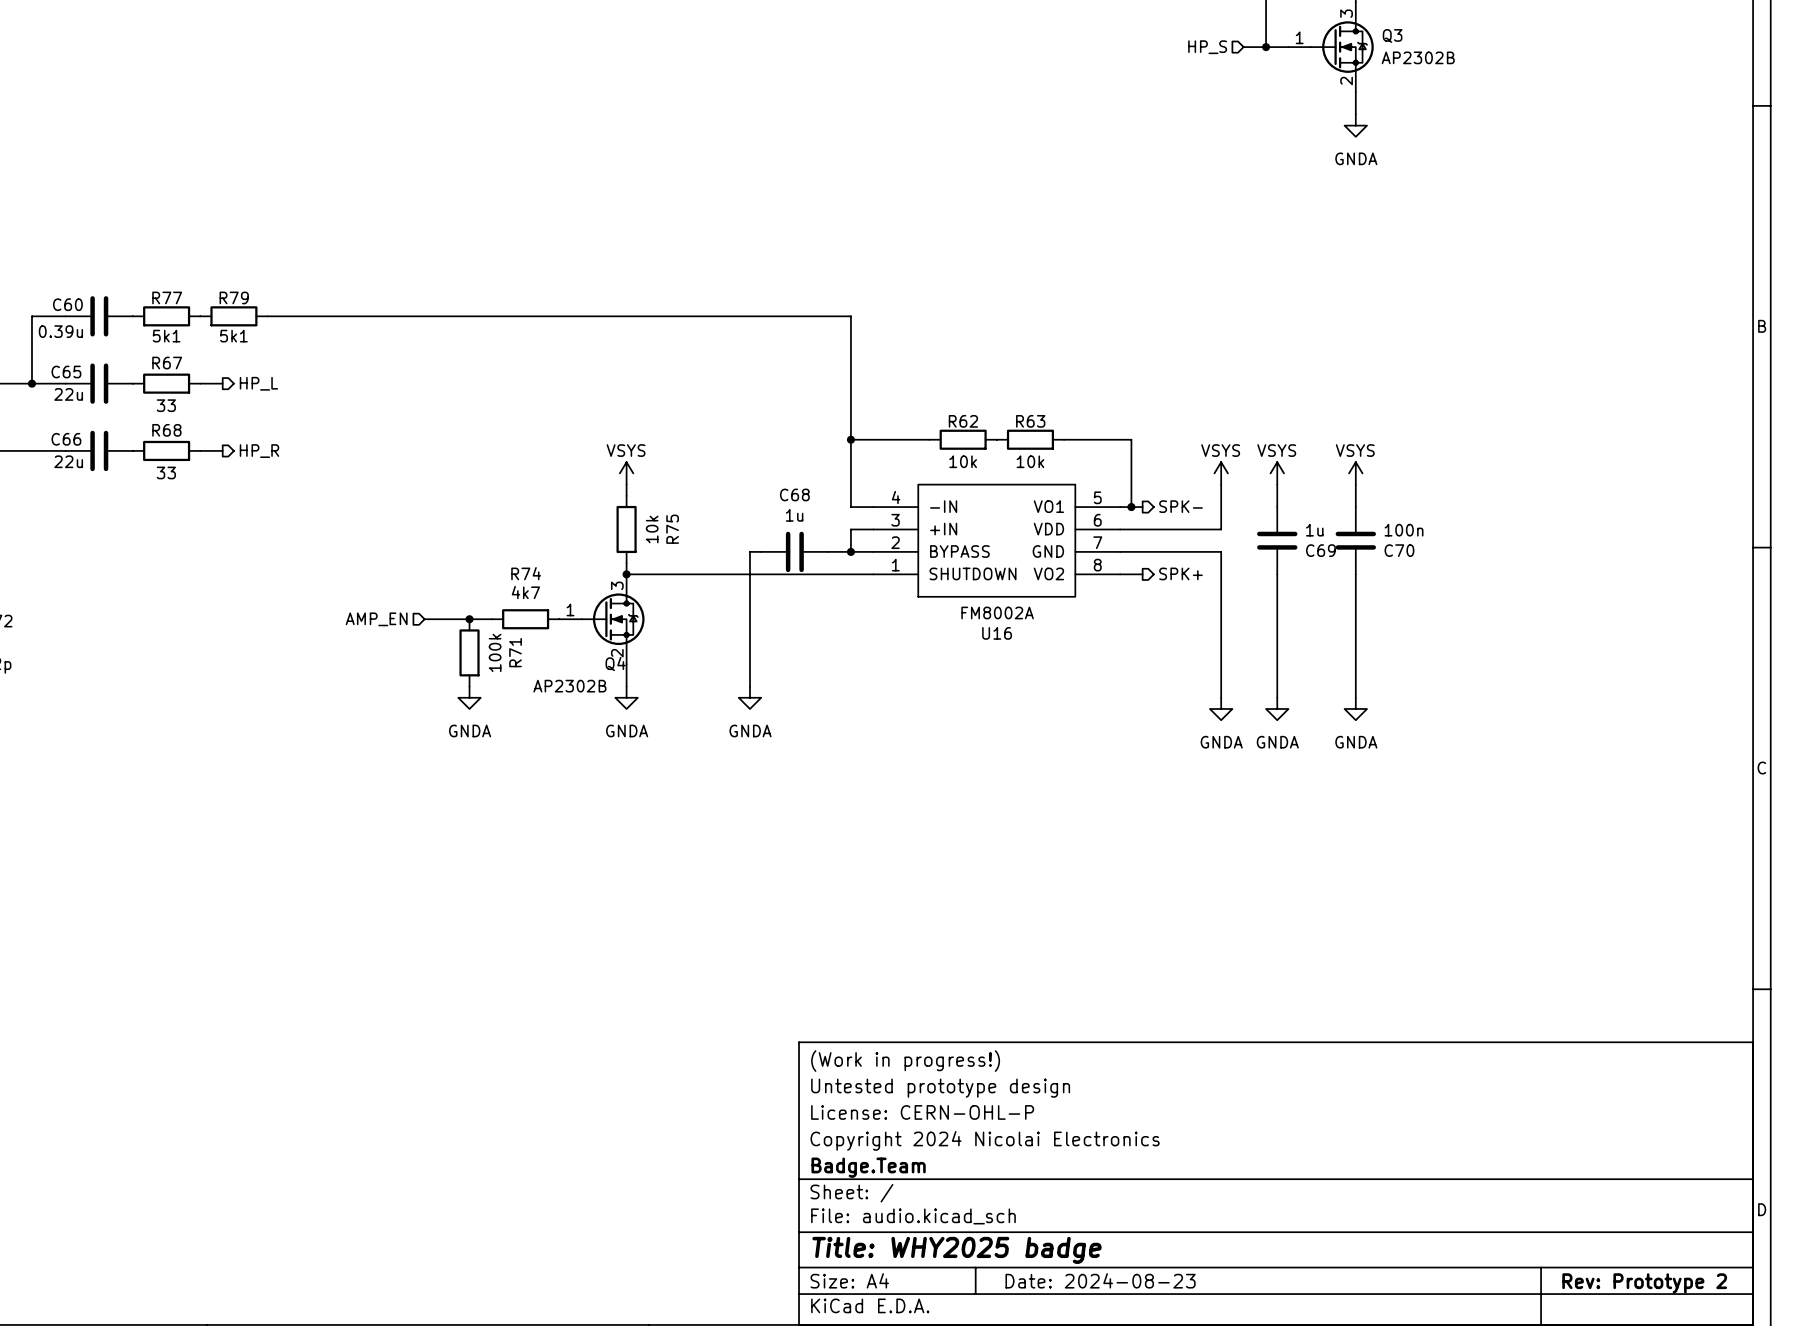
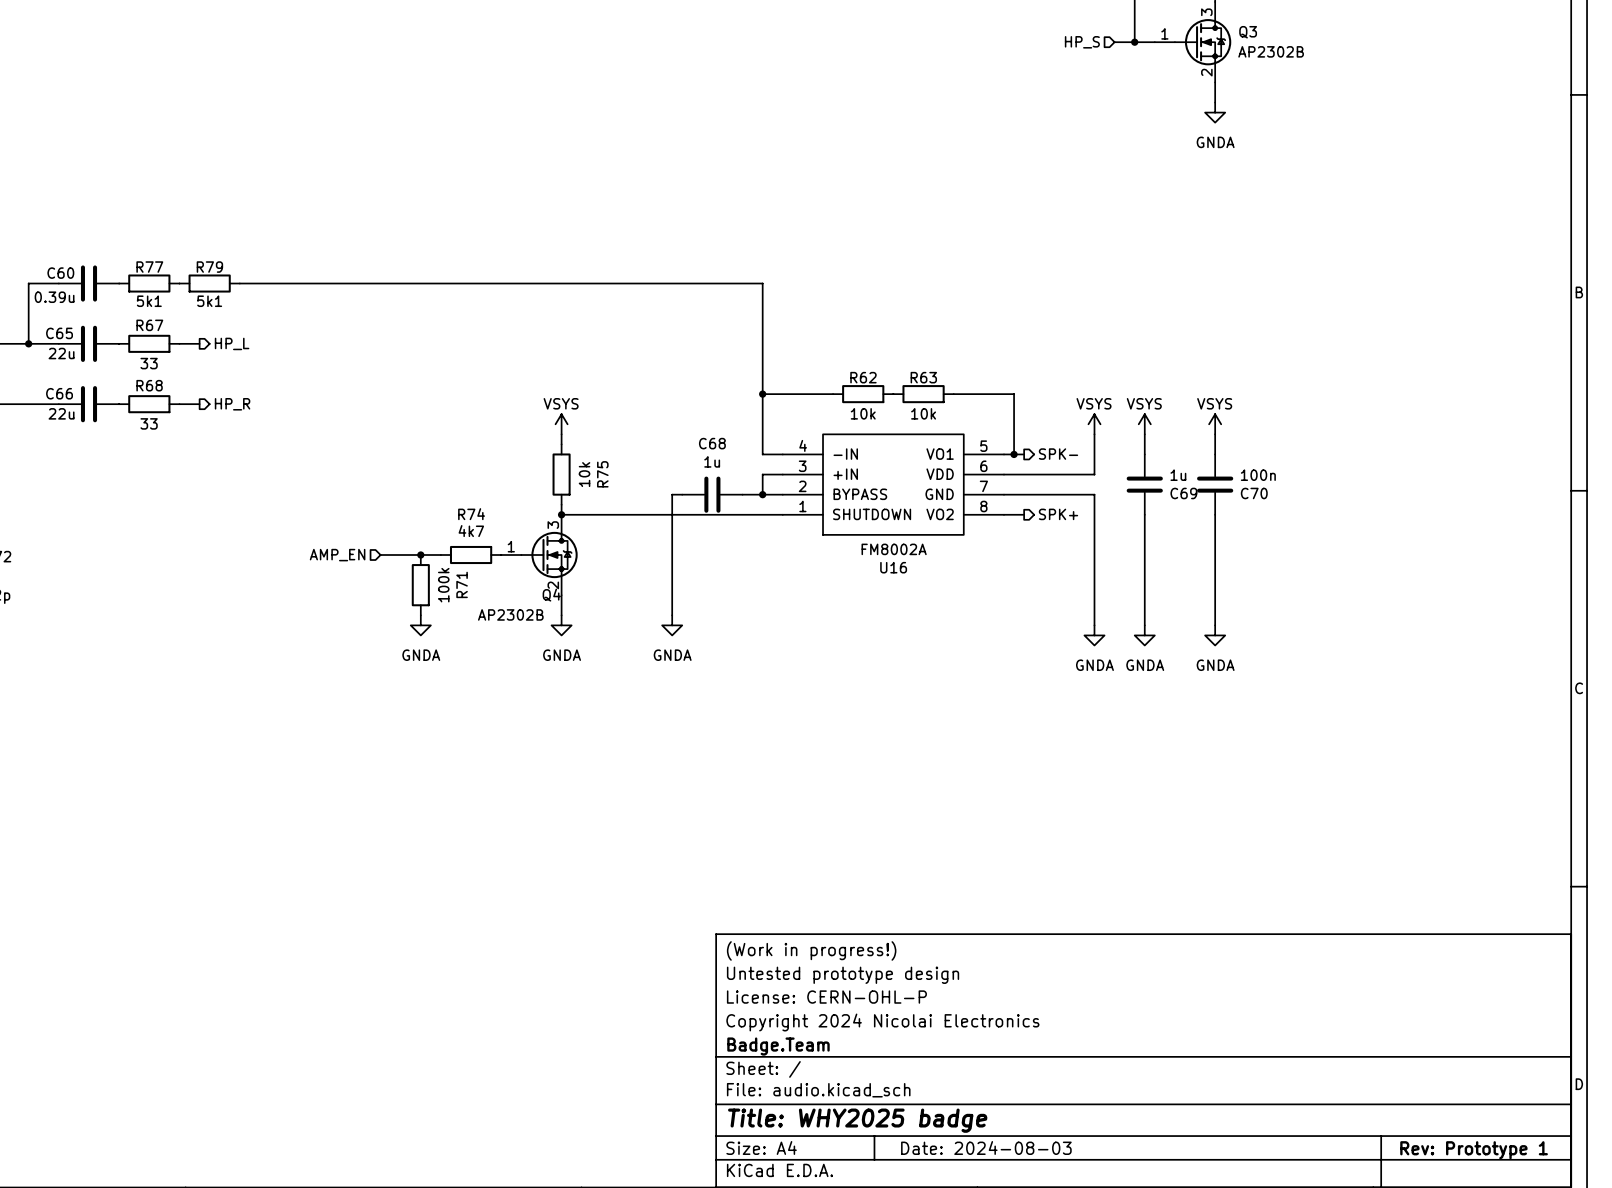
title block: Date: 2024-08-23 (1100, 1280) -> Date: 2024-08-03 (986, 1147)
title block: Rev: Prototype 2 (1644, 1283) -> Rev: Prototype 1 (1474, 1150)

